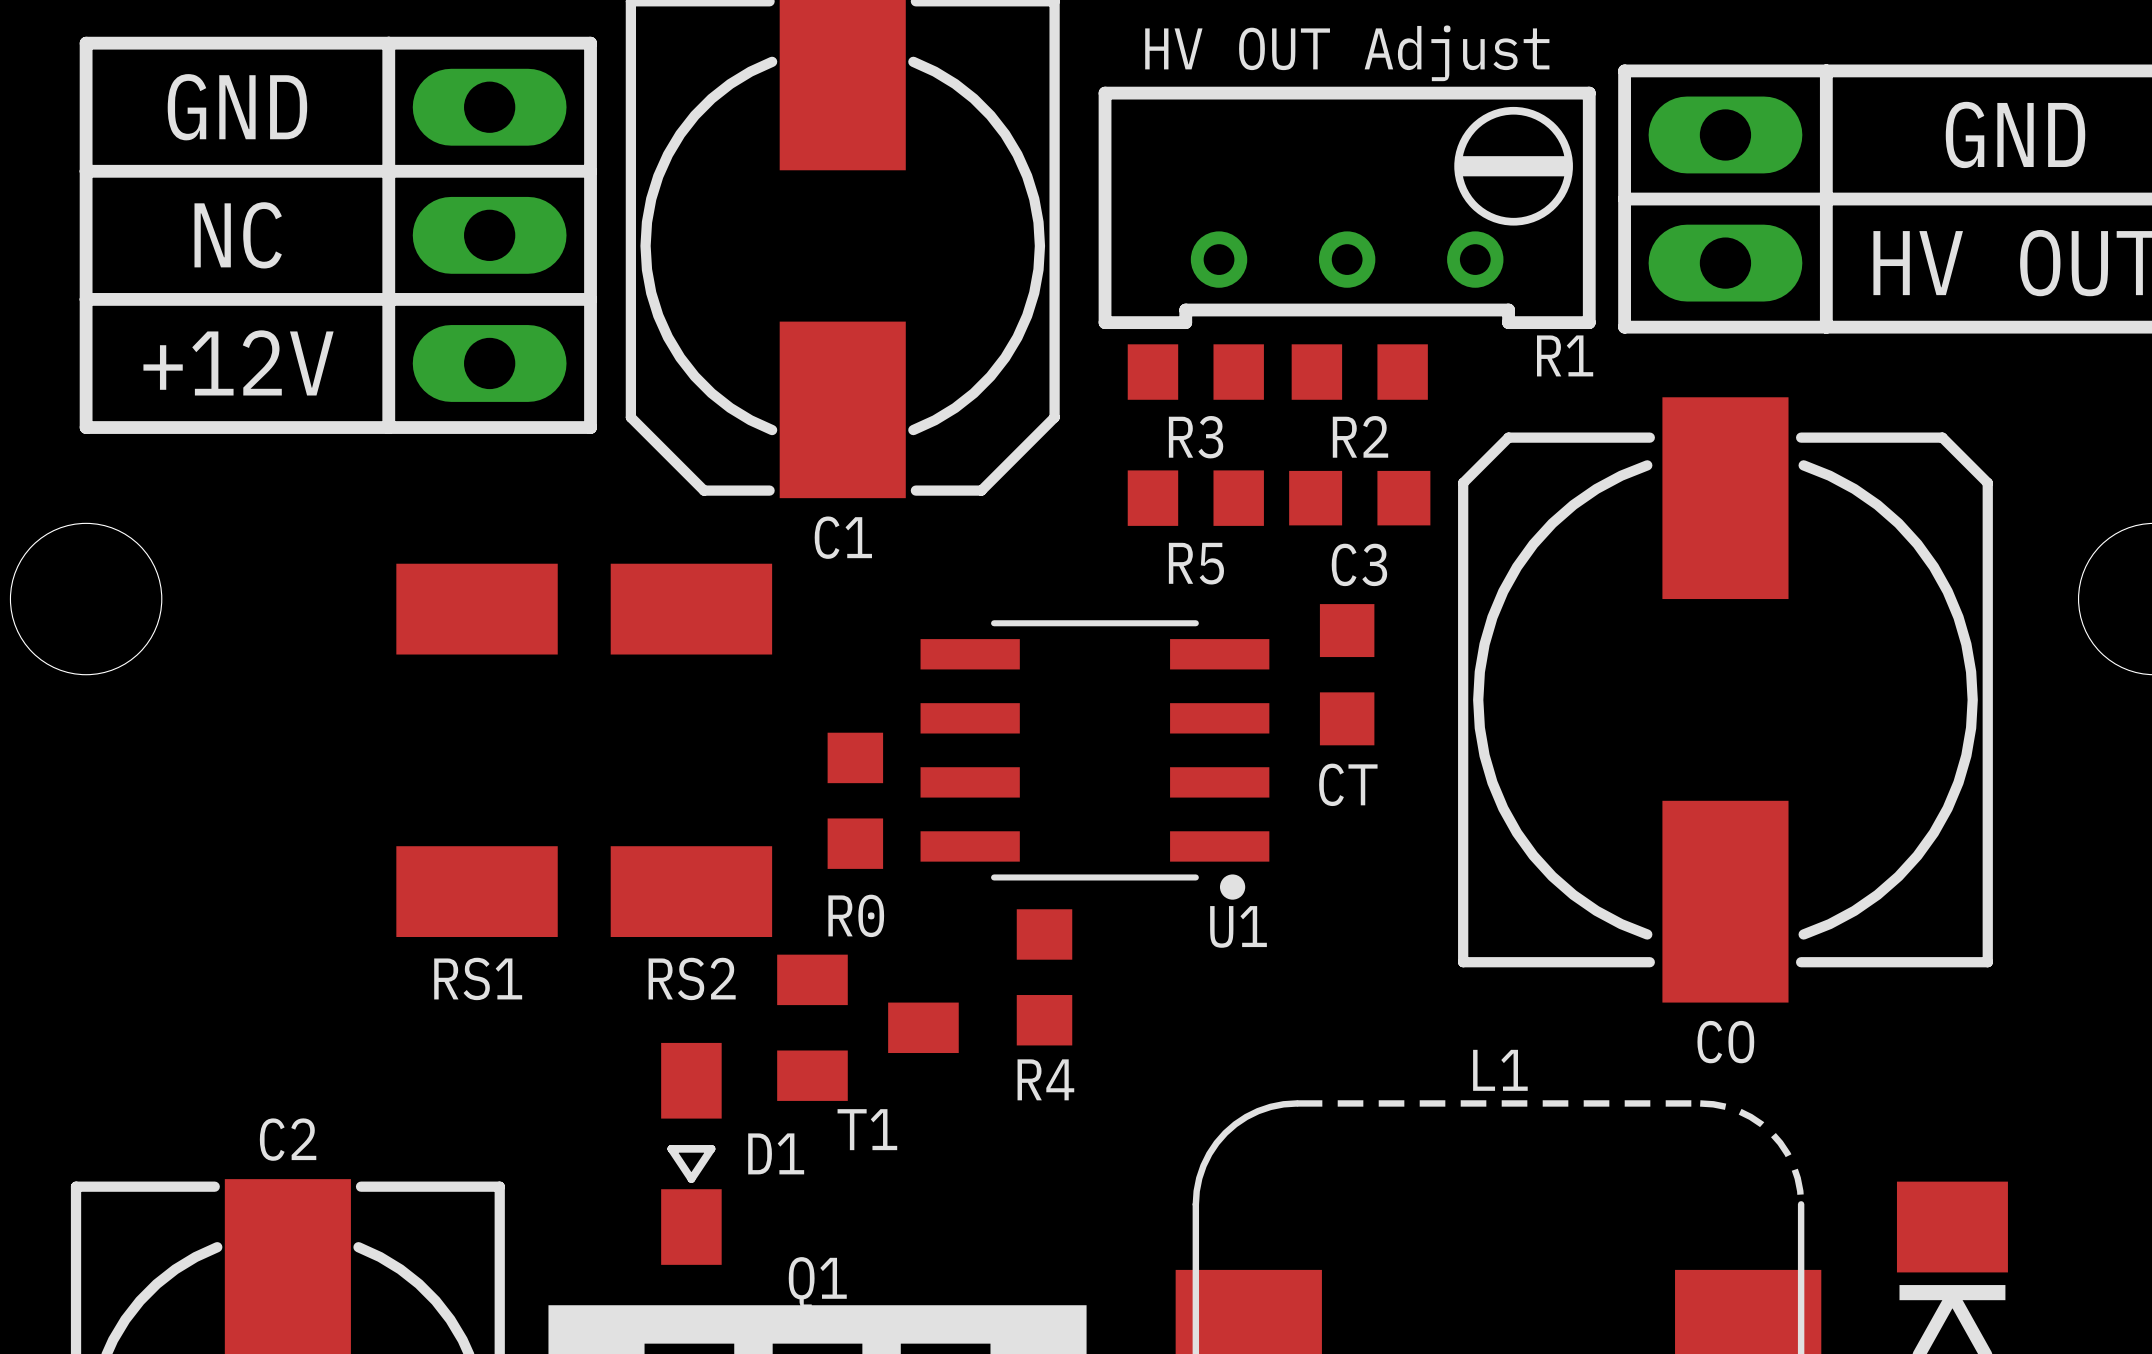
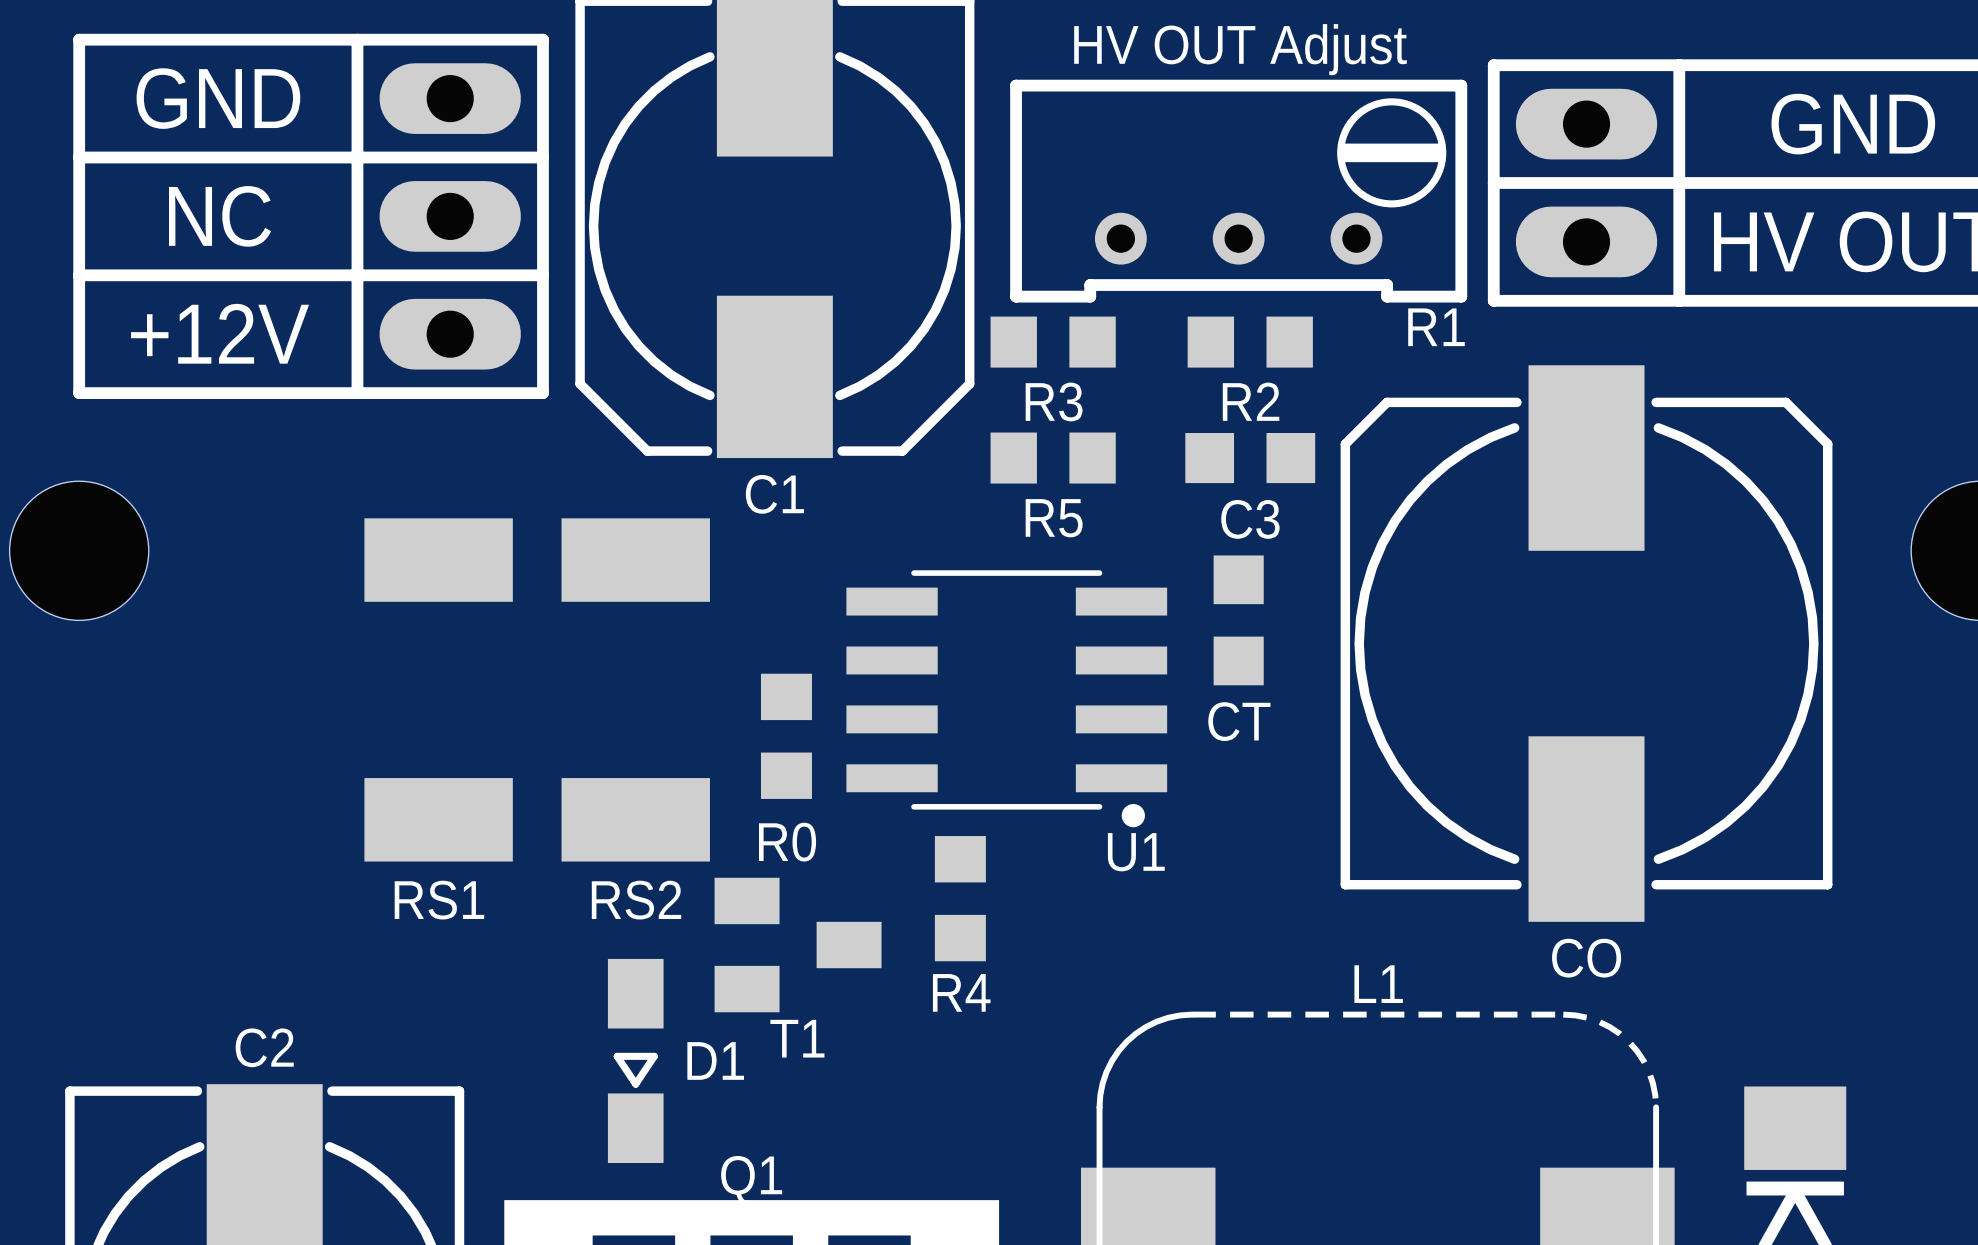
R3 position: (1195, 372) -> (1053, 342)
R5 position: (1195, 498) -> (1053, 458)

